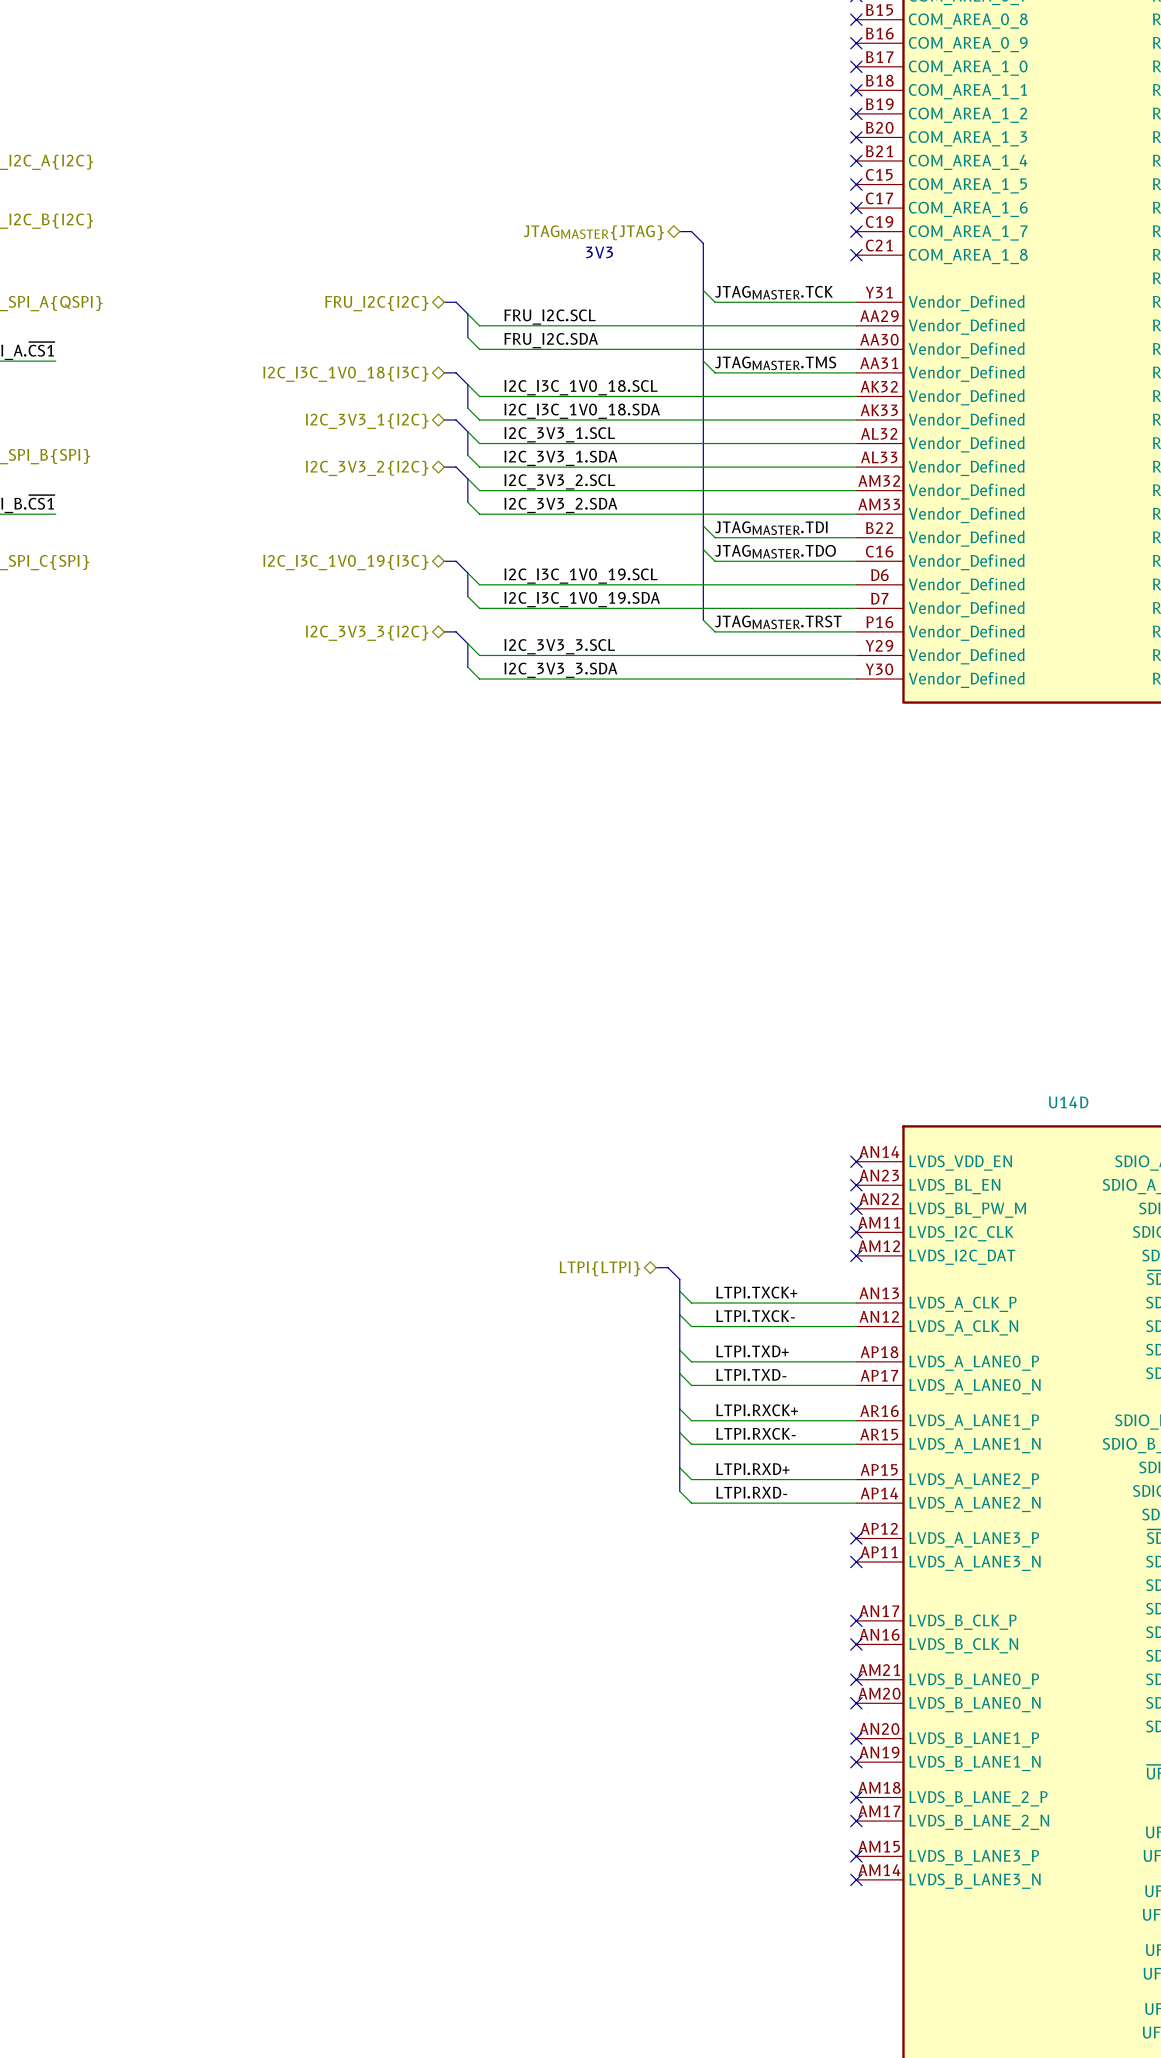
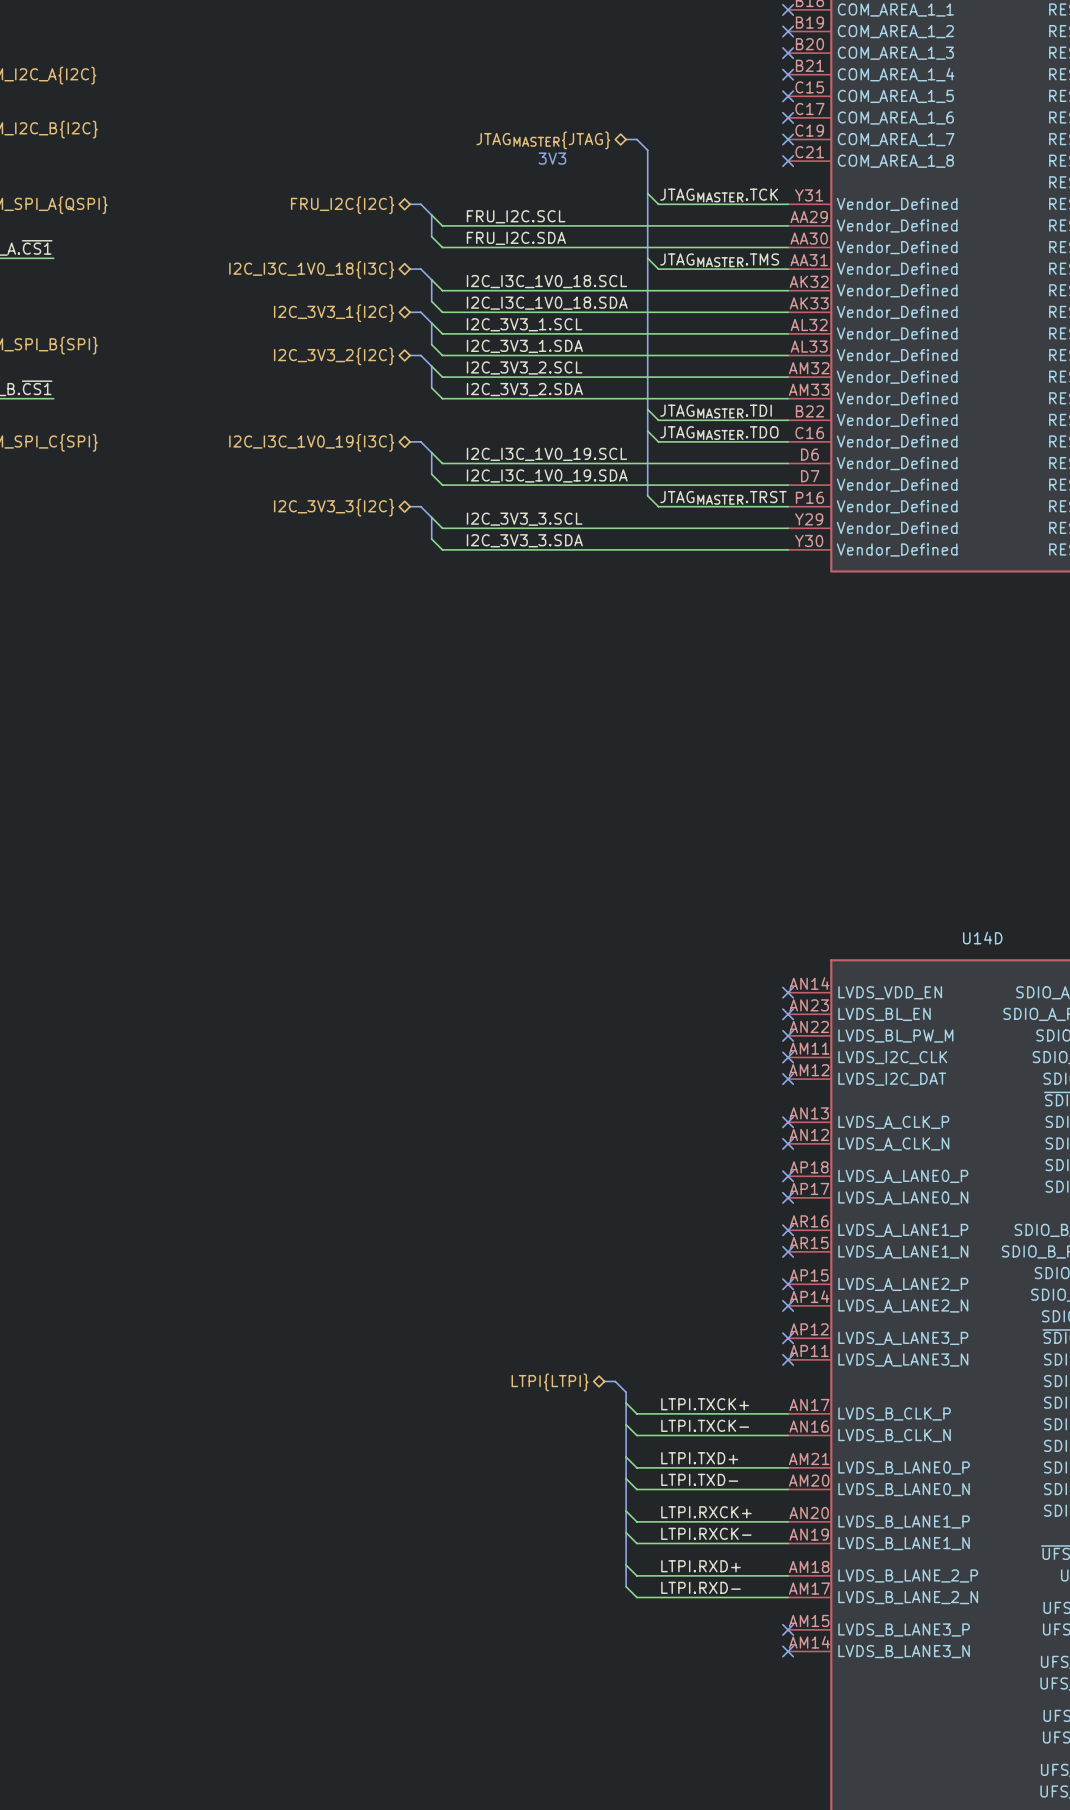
bus: (656, 1267) (668, 1267) (679, 1279) (679, 1491) -> none
hierarchical label: LTPI{LTPI} (599, 1268) -> none
wire: (679, 1291) (691, 1303) (856, 1303) -> none
label: LTPI.TXCK+ (756, 1292) -> none
no-connect mark: none -> (788, 1122)
wire: (679, 1314) (691, 1326) (856, 1326) -> none
label: LTPI.TXCK- (755, 1316) -> none
no-connect mark: none -> (788, 1143)
wire: (679, 1350) (691, 1361) (856, 1361) -> none
label: LTPI.TXD+ (752, 1351) -> none
no-connect mark: none -> (788, 1176)
wire: (679, 1373) (691, 1385) (856, 1385) -> none
label: LTPI.TXD- (751, 1374) -> none
no-connect mark: none -> (788, 1197)
wire: (679, 1408) (691, 1420) (856, 1420) -> (626, 1403) (636, 1413) (788, 1413)
label: LTPI.RXCK+ (757, 1410) -> none
no-connect mark: none -> (788, 1230)
wire: (679, 1432) (691, 1444) (856, 1444) -> (626, 1424) (636, 1435) (788, 1435)
label: LTPI.RXCK- (755, 1433) -> none
no-connect mark: none -> (788, 1251)
wire: (679, 1467) (691, 1479) (856, 1479) -> (626, 1457) (636, 1467) (788, 1467)
label: LTPI.RXD+ (752, 1469) -> none
no-connect mark: none -> (788, 1284)
wire: (679, 1491) (691, 1503) (856, 1503) -> (626, 1478) (636, 1489) (788, 1489)
label: LTPI.RXD- (751, 1492) -> none
no-connect mark: none -> (788, 1305)
bus: none -> (604, 1381) (615, 1381) (626, 1392) (626, 1586)
hierarchical label: none -> LTPI{LTPI} (550, 1382)
label: none -> LTPI.TXCK+ (705, 1404)
no-connect mark: (856, 1620) -> none
label: none -> LTPI.TXCK- (705, 1425)
no-connect mark: (856, 1644) -> none
label: none -> LTPI.TXD+ (699, 1458)
no-connect mark: (856, 1679) -> none
label: none -> LTPI.TXD- (699, 1479)
no-connect mark: (856, 1703) -> none
wire: none -> (626, 1511) (636, 1521) (788, 1521)
label: none -> LTPI.RXCK+ (706, 1512)
no-connect mark: (856, 1738) -> none
wire: none -> (626, 1532) (636, 1543) (788, 1543)
label: none -> LTPI.RXCK- (706, 1533)
no-connect mark: (856, 1762) -> none
wire: none -> (626, 1565) (636, 1575) (788, 1575)
label: none -> LTPI.RXD+ (701, 1566)
no-connect mark: (856, 1797) -> none
wire: none -> (626, 1586) (636, 1597) (788, 1597)
label: none -> LTPI.RXD- (701, 1587)
no-connect mark: (856, 1821) -> none

